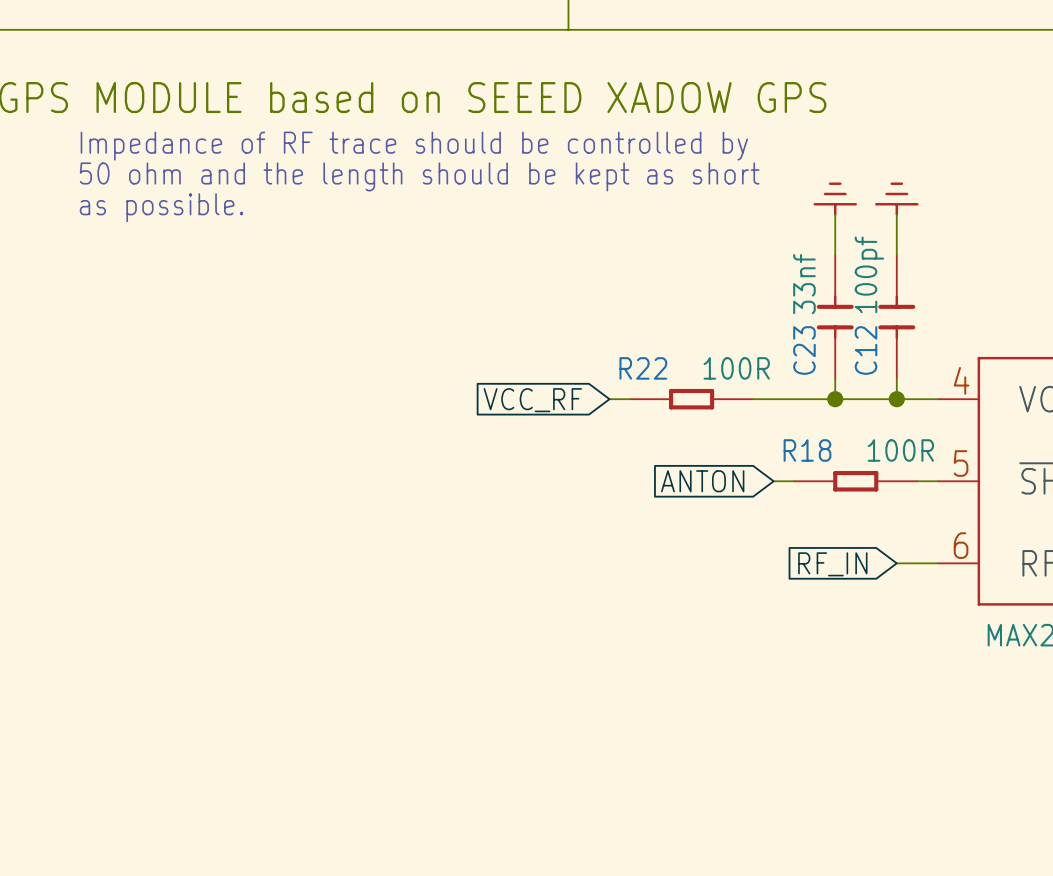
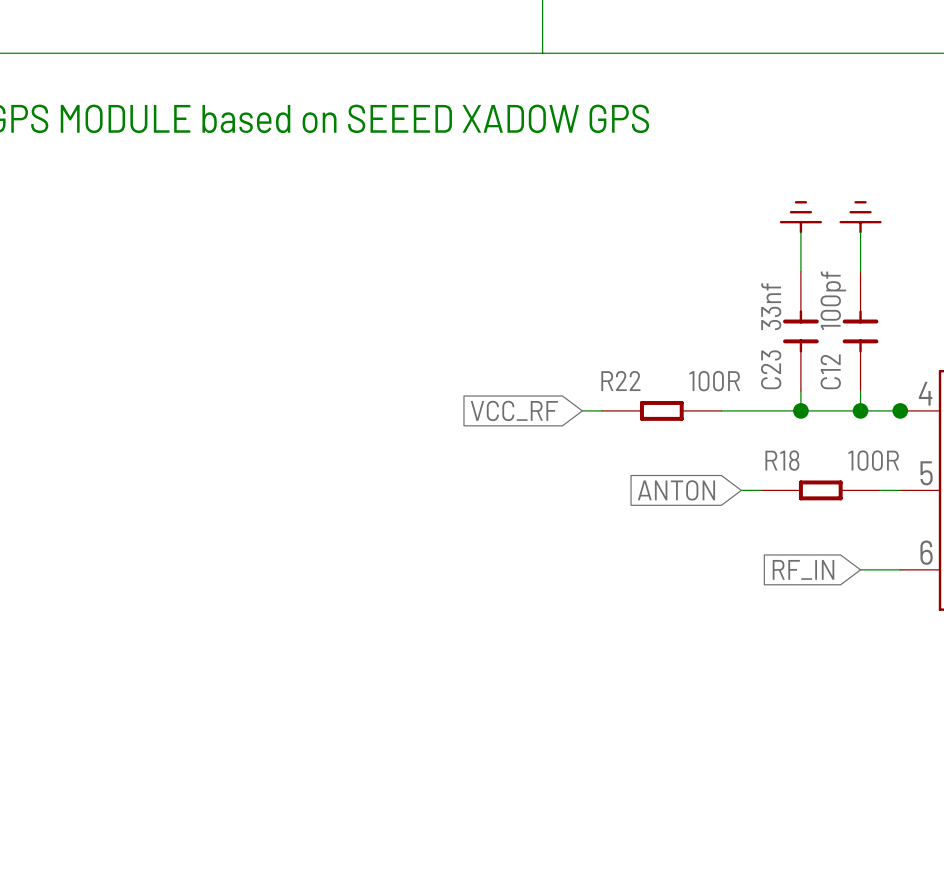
text: Impedance of RF trace should be controlled by (414, 146) -> none
text: 50 ohm and the length should be kept as short (419, 176) -> none
text: as possible. (161, 207) -> none
junction: none -> (900, 410)

